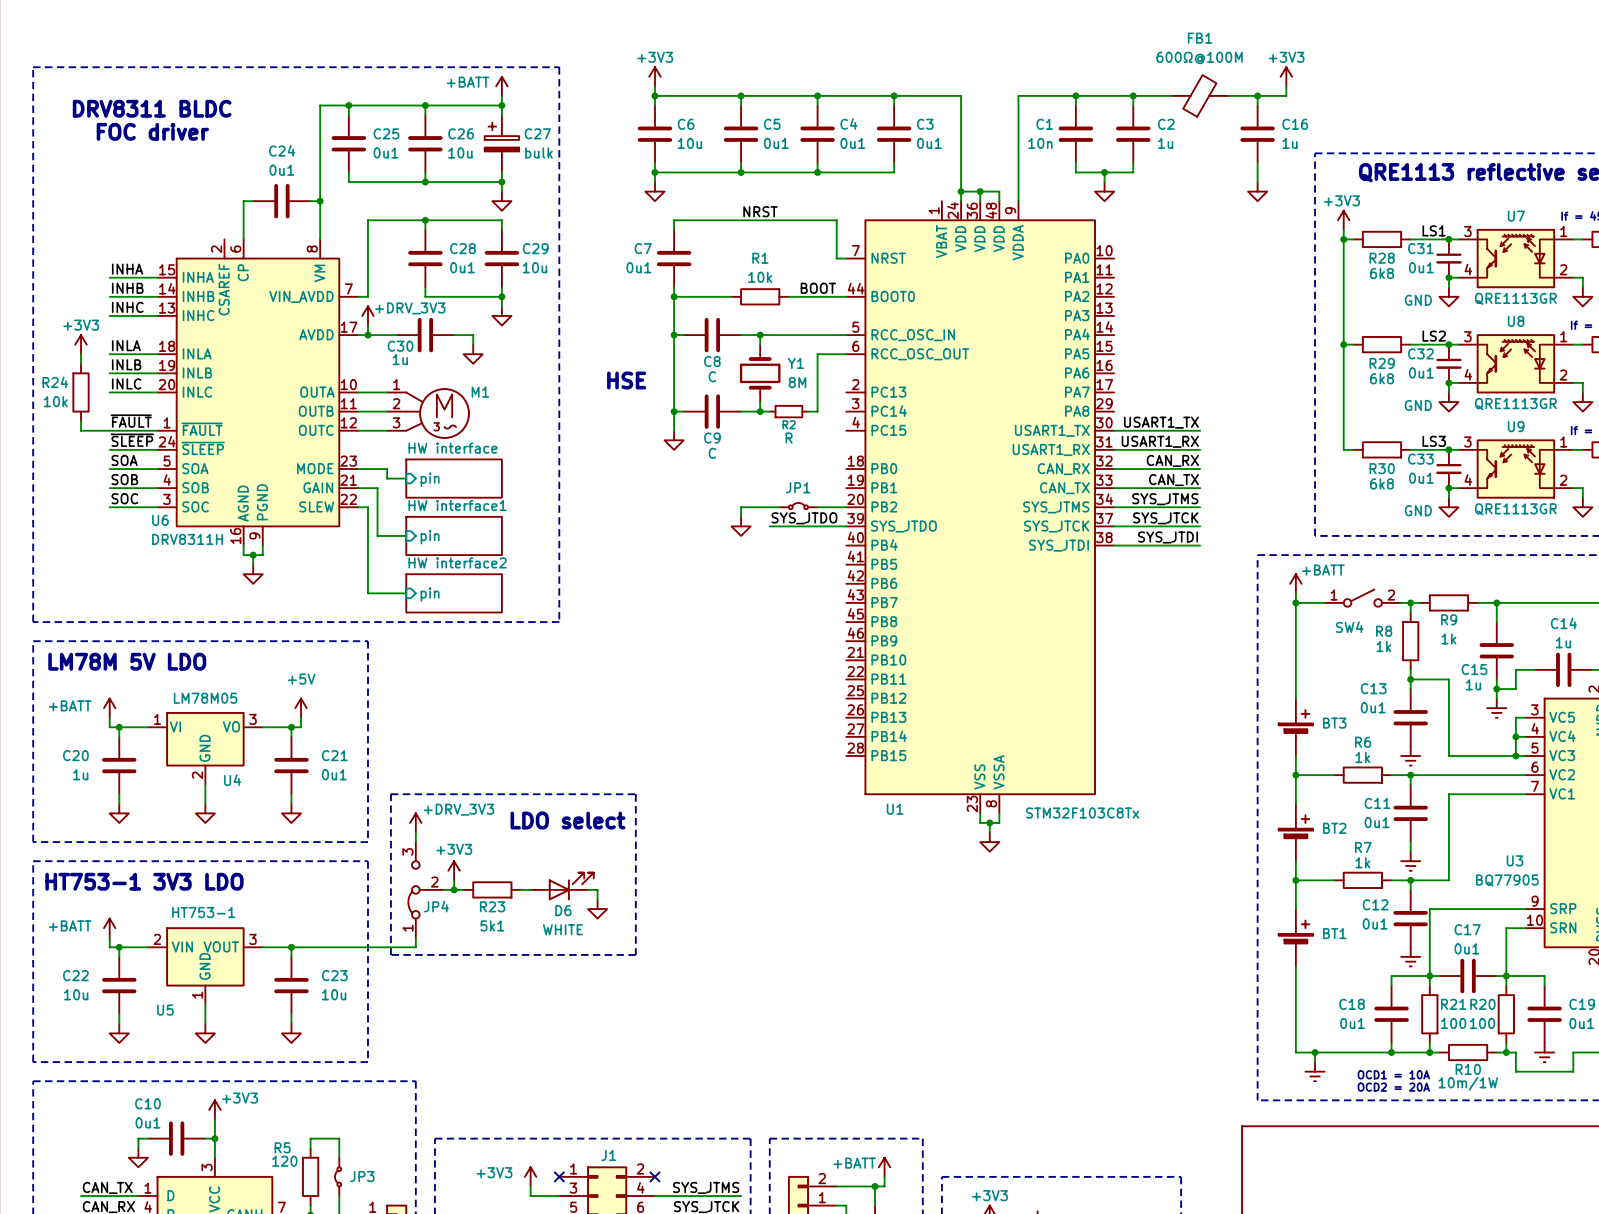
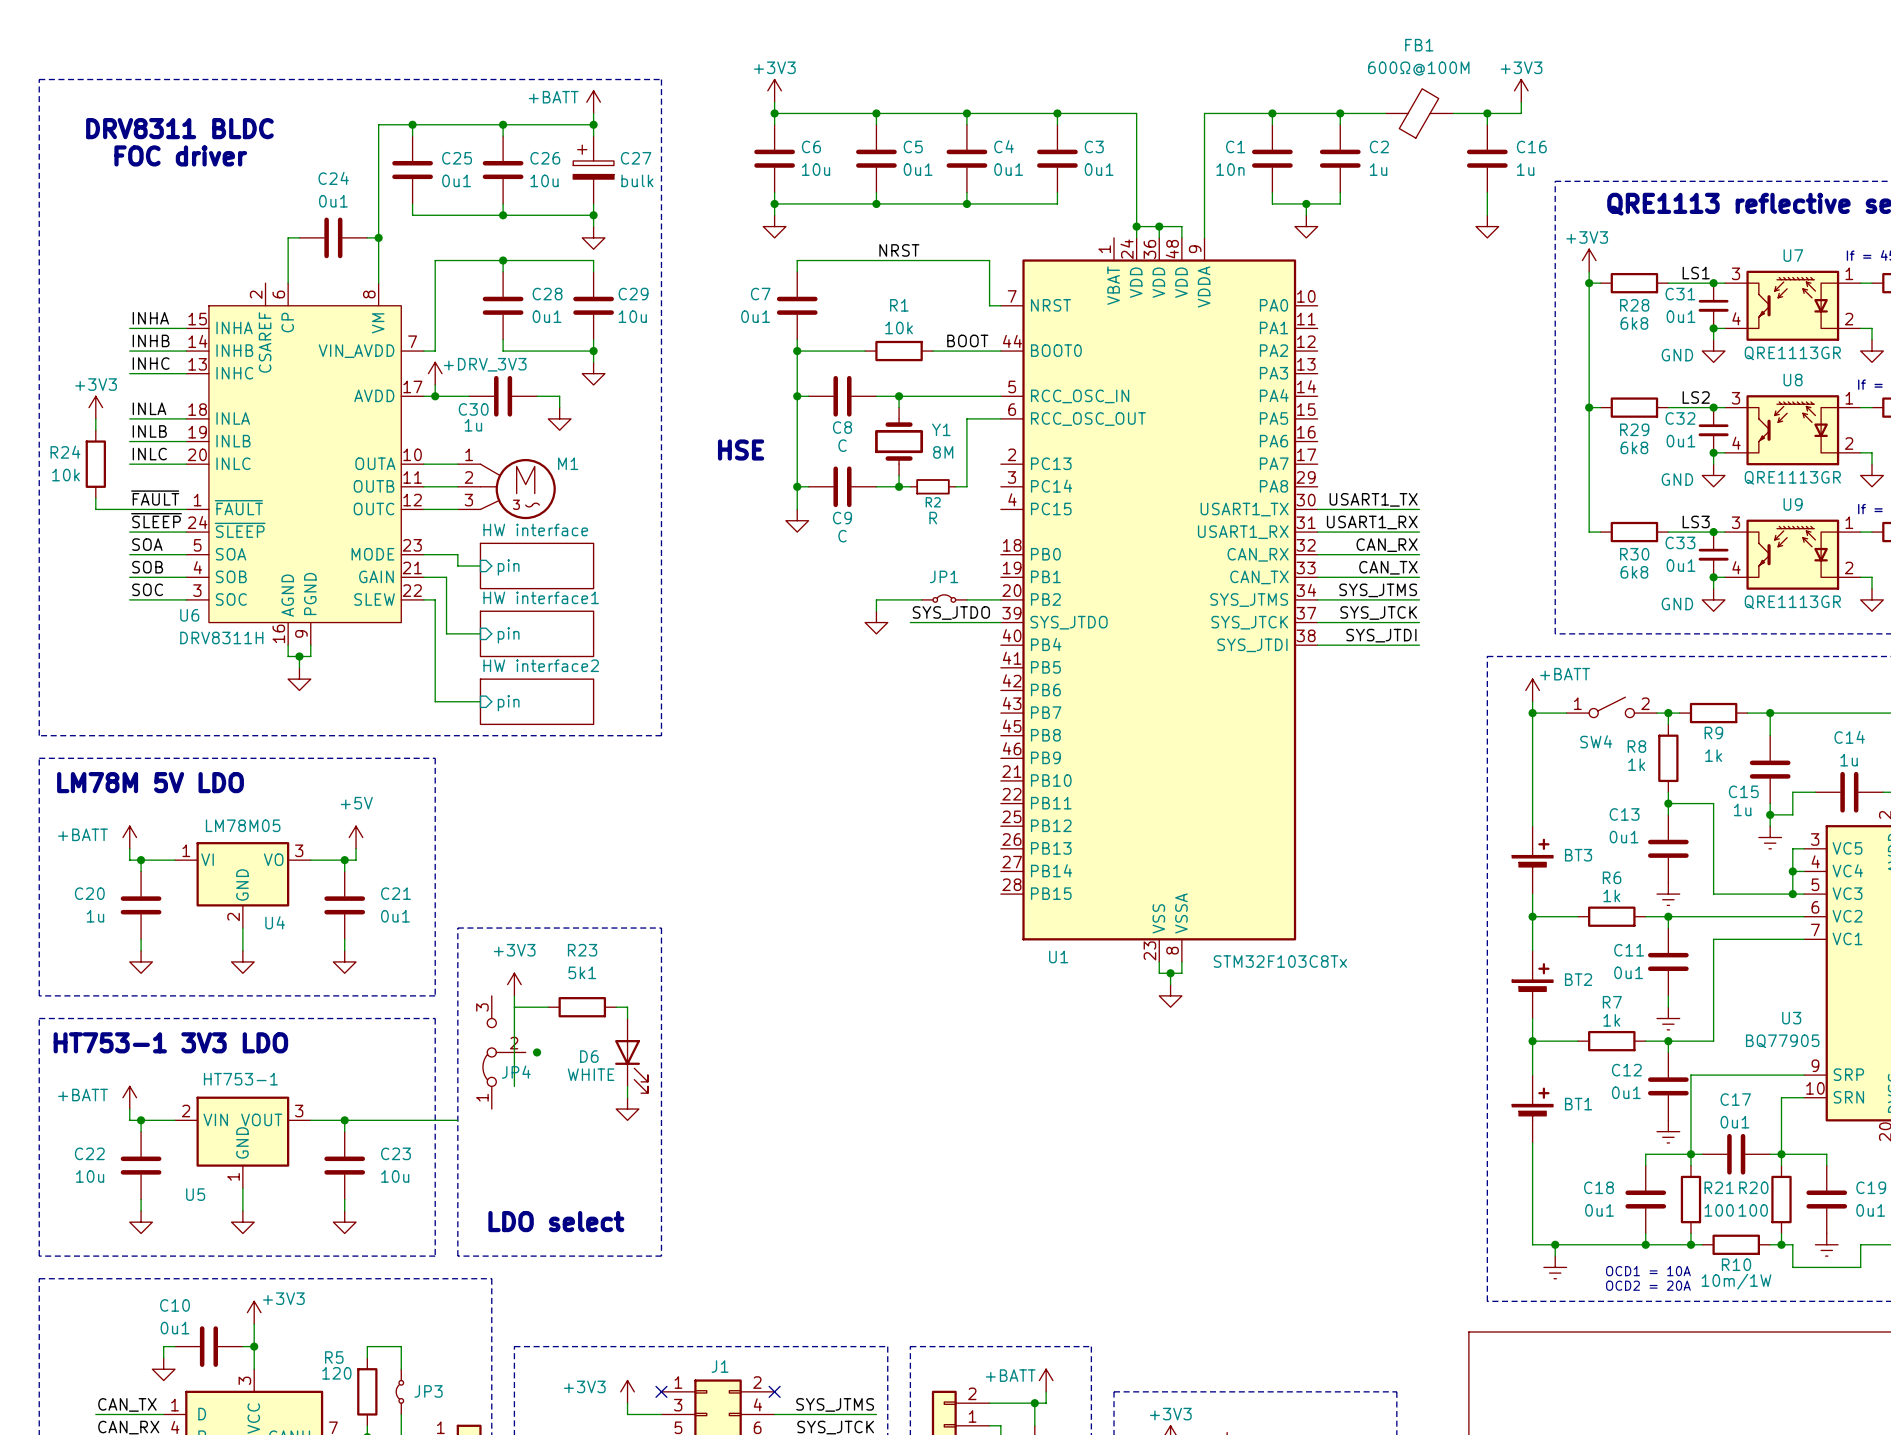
line: none -> (457, 928) (661, 928) (661, 1256) (457, 1256) (457, 928)
line: (390, 794) (635, 794) (635, 954) (390, 954) (390, 794) -> none
text: LDO select (567, 820) -> none
power symbol: +DRV_3V3 (415, 822) -> none
wire: (415, 832) (415, 842) -> none
wire: none -> (514, 995) (514, 1086)
power symbol text position: +3V3 (454, 849) -> +3V3 (514, 950)
wire: none -> (514, 1007) (548, 1007)
power symbol position: +3V3 (454, 870) -> +3V3 (514, 984)
wire: (454, 880) (454, 889) -> (627, 1086) (627, 1097)
D6 rotation: 0° (571, 886) -> 90° clockwise (631, 1066)
wire: (444, 889) (463, 889) -> none
R23 position: (492, 889) -> (582, 1007)
wire: (521, 889) (530, 889) -> none
wire: (588, 889) (597, 889) (597, 899) -> (616, 1007) (627, 1007) (627, 1018)
R23 name position: R23 (492, 906) -> R23 (582, 950)
power symbol position: (597, 909) -> (627, 1109)
R23 value position: 5k1 (492, 925) -> 5k1 (582, 972)
D6 value position: WHITE (562, 929) -> WHITE (591, 1074)
wire: (415, 937) (415, 947) (387, 947) -> none
text: none -> LDO select (556, 1221)

